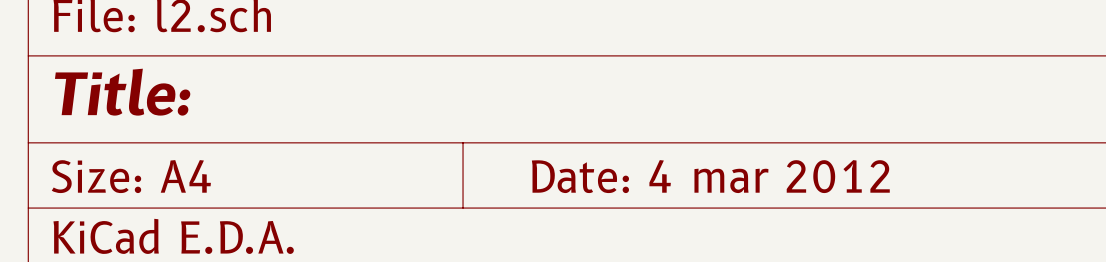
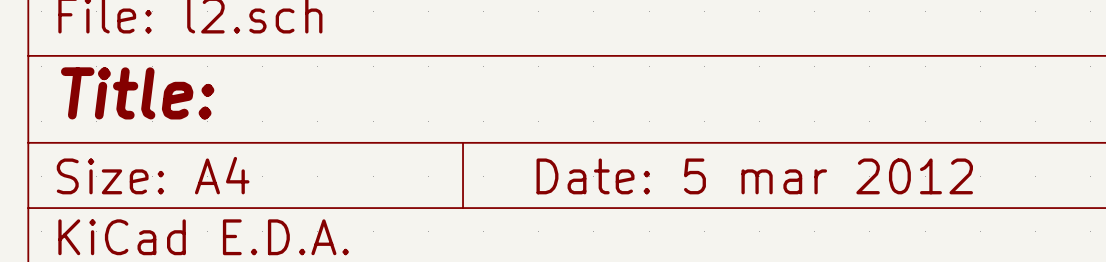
title block: Date: 4 mar 2012 (710, 176) -> Date: 5 mar 2012 (754, 176)

